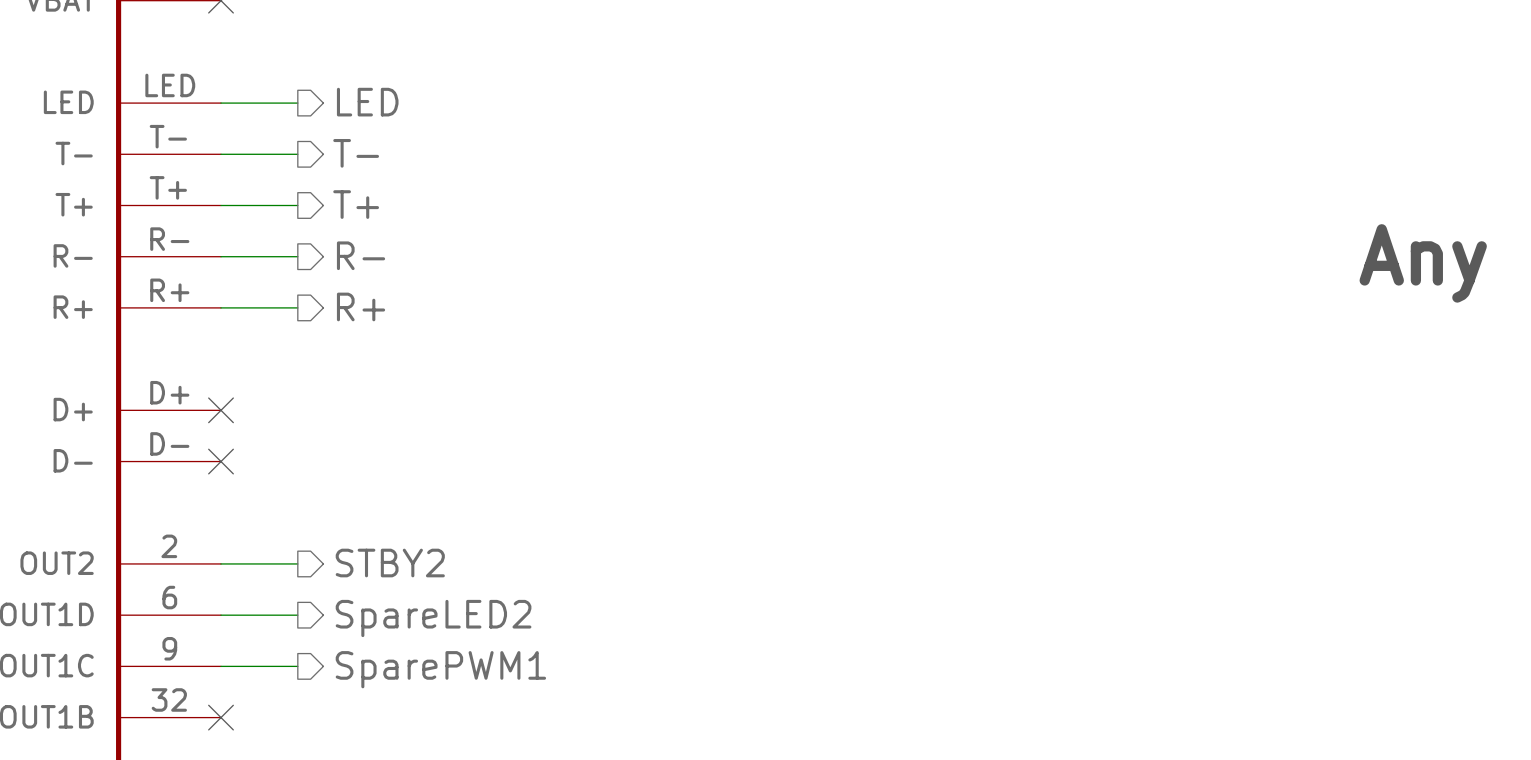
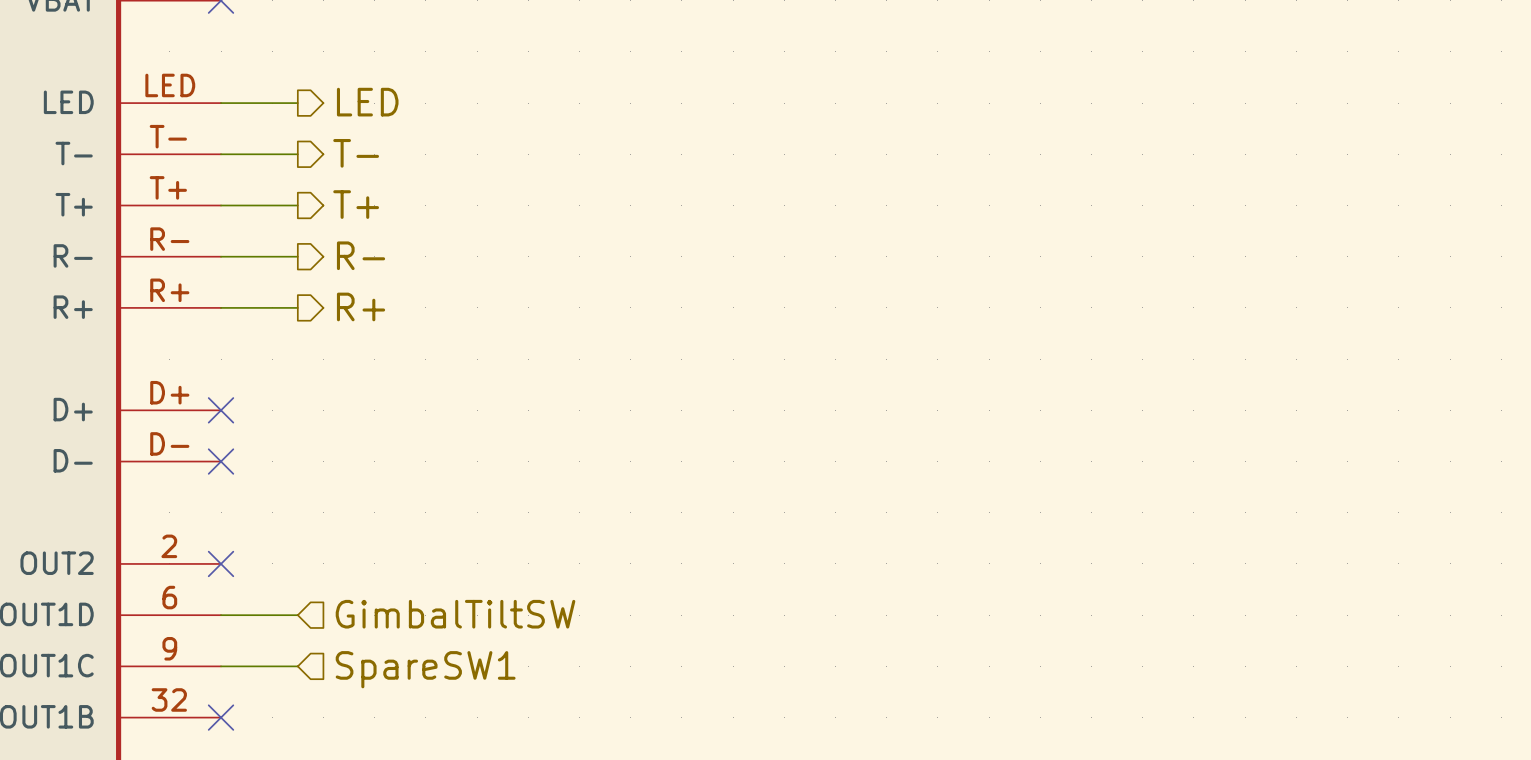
text: Any (1423, 263) -> none
wire: (221, 563) (297, 563) -> none
no-connect mark: none -> (221, 563)
hierarchical label: STBY2 (390, 563) -> none
hierarchical label shape: output (433, 618) -> input (455, 614)
hierarchical label: SpareLED2 (433, 618) -> GimbalTiltSW (455, 614)
hierarchical label shape: output (440, 669) -> input (425, 669)
hierarchical label: SparePWM1 (440, 669) -> SpareSW1 (425, 669)

